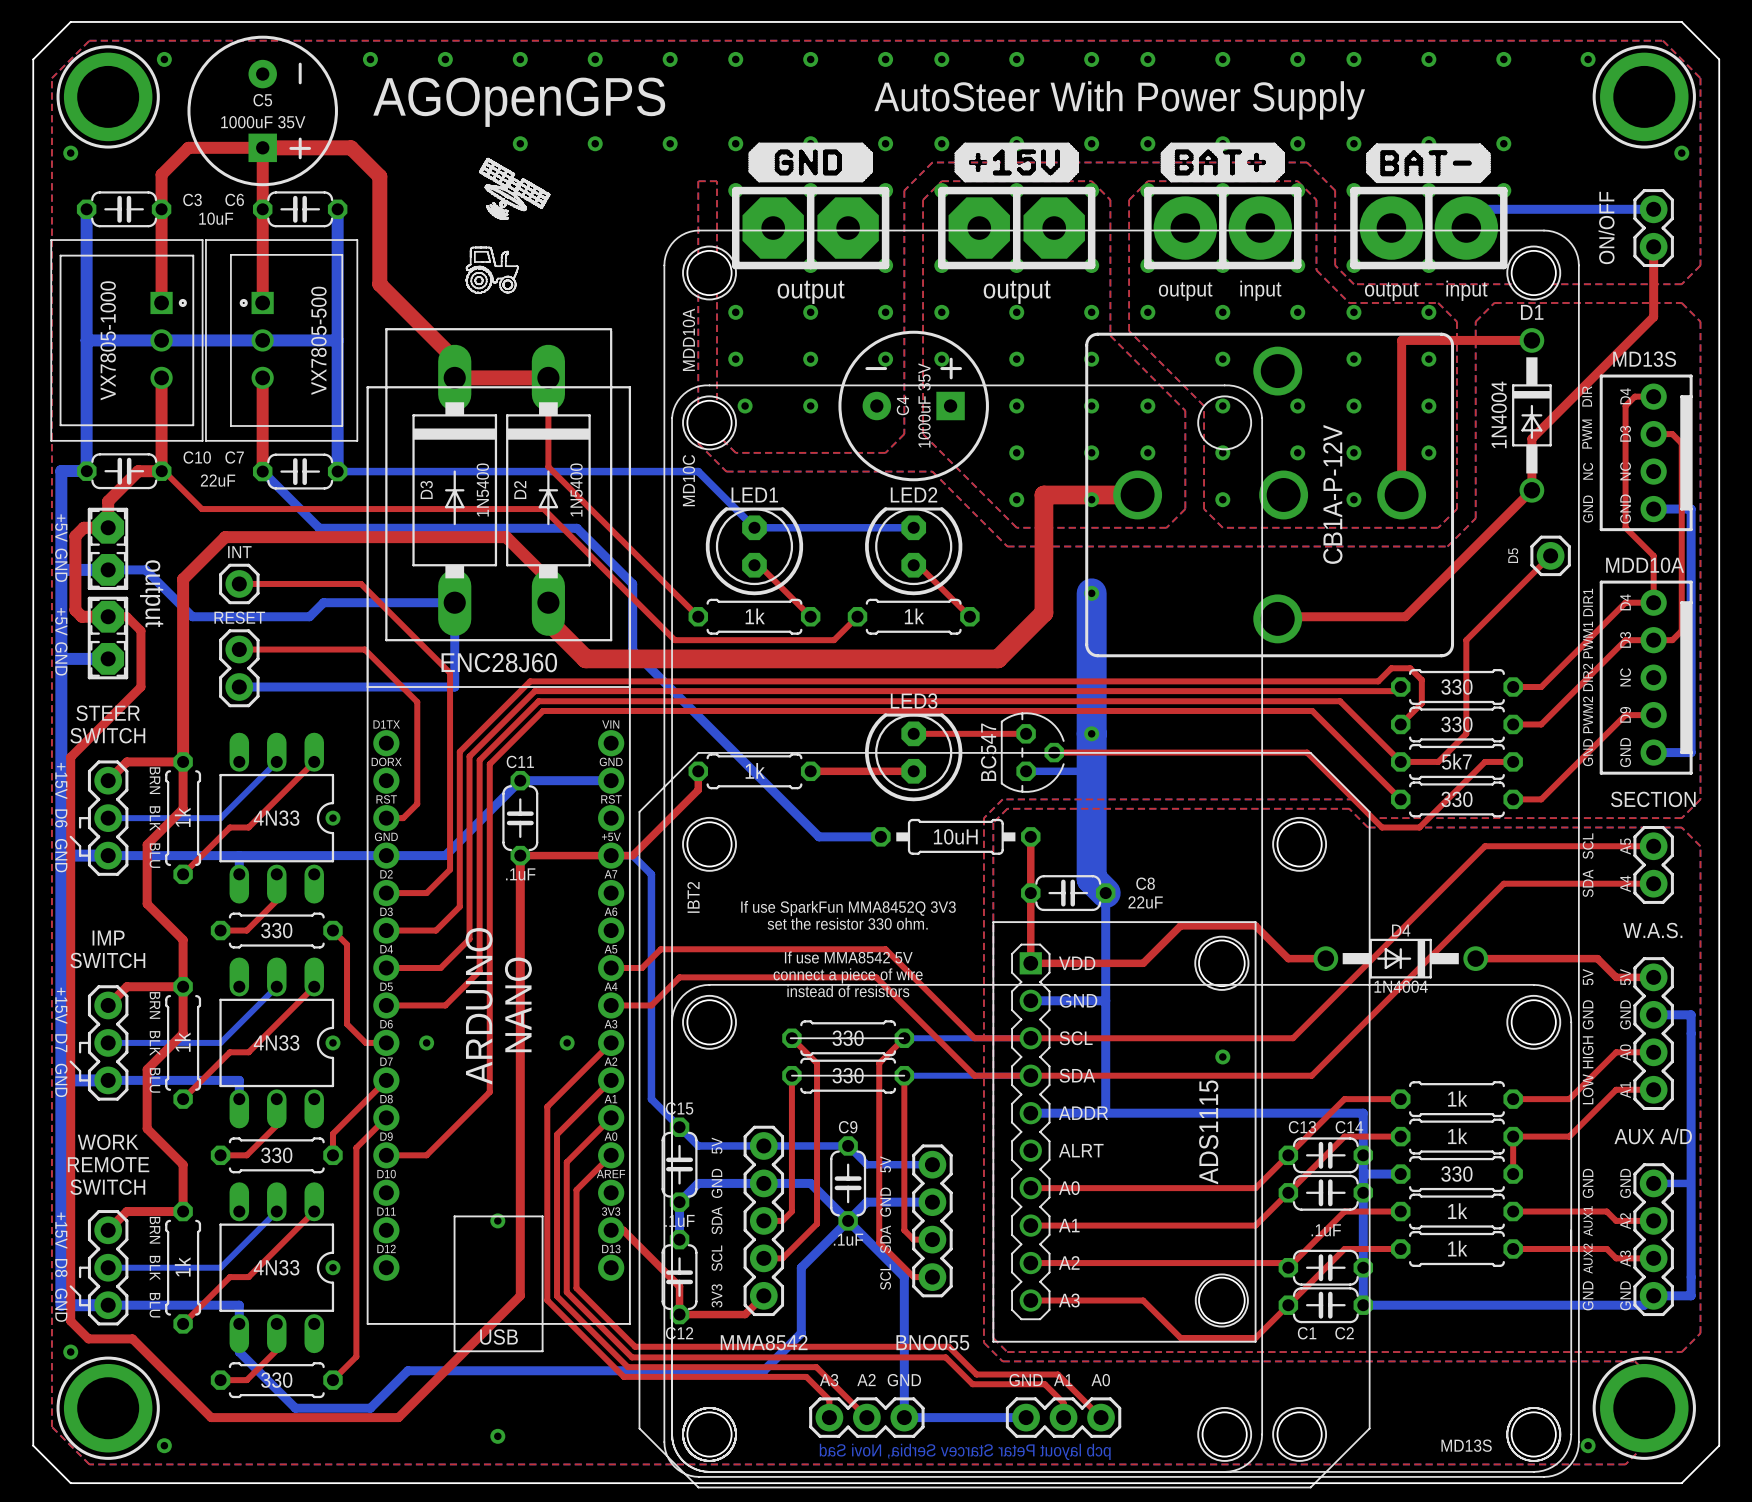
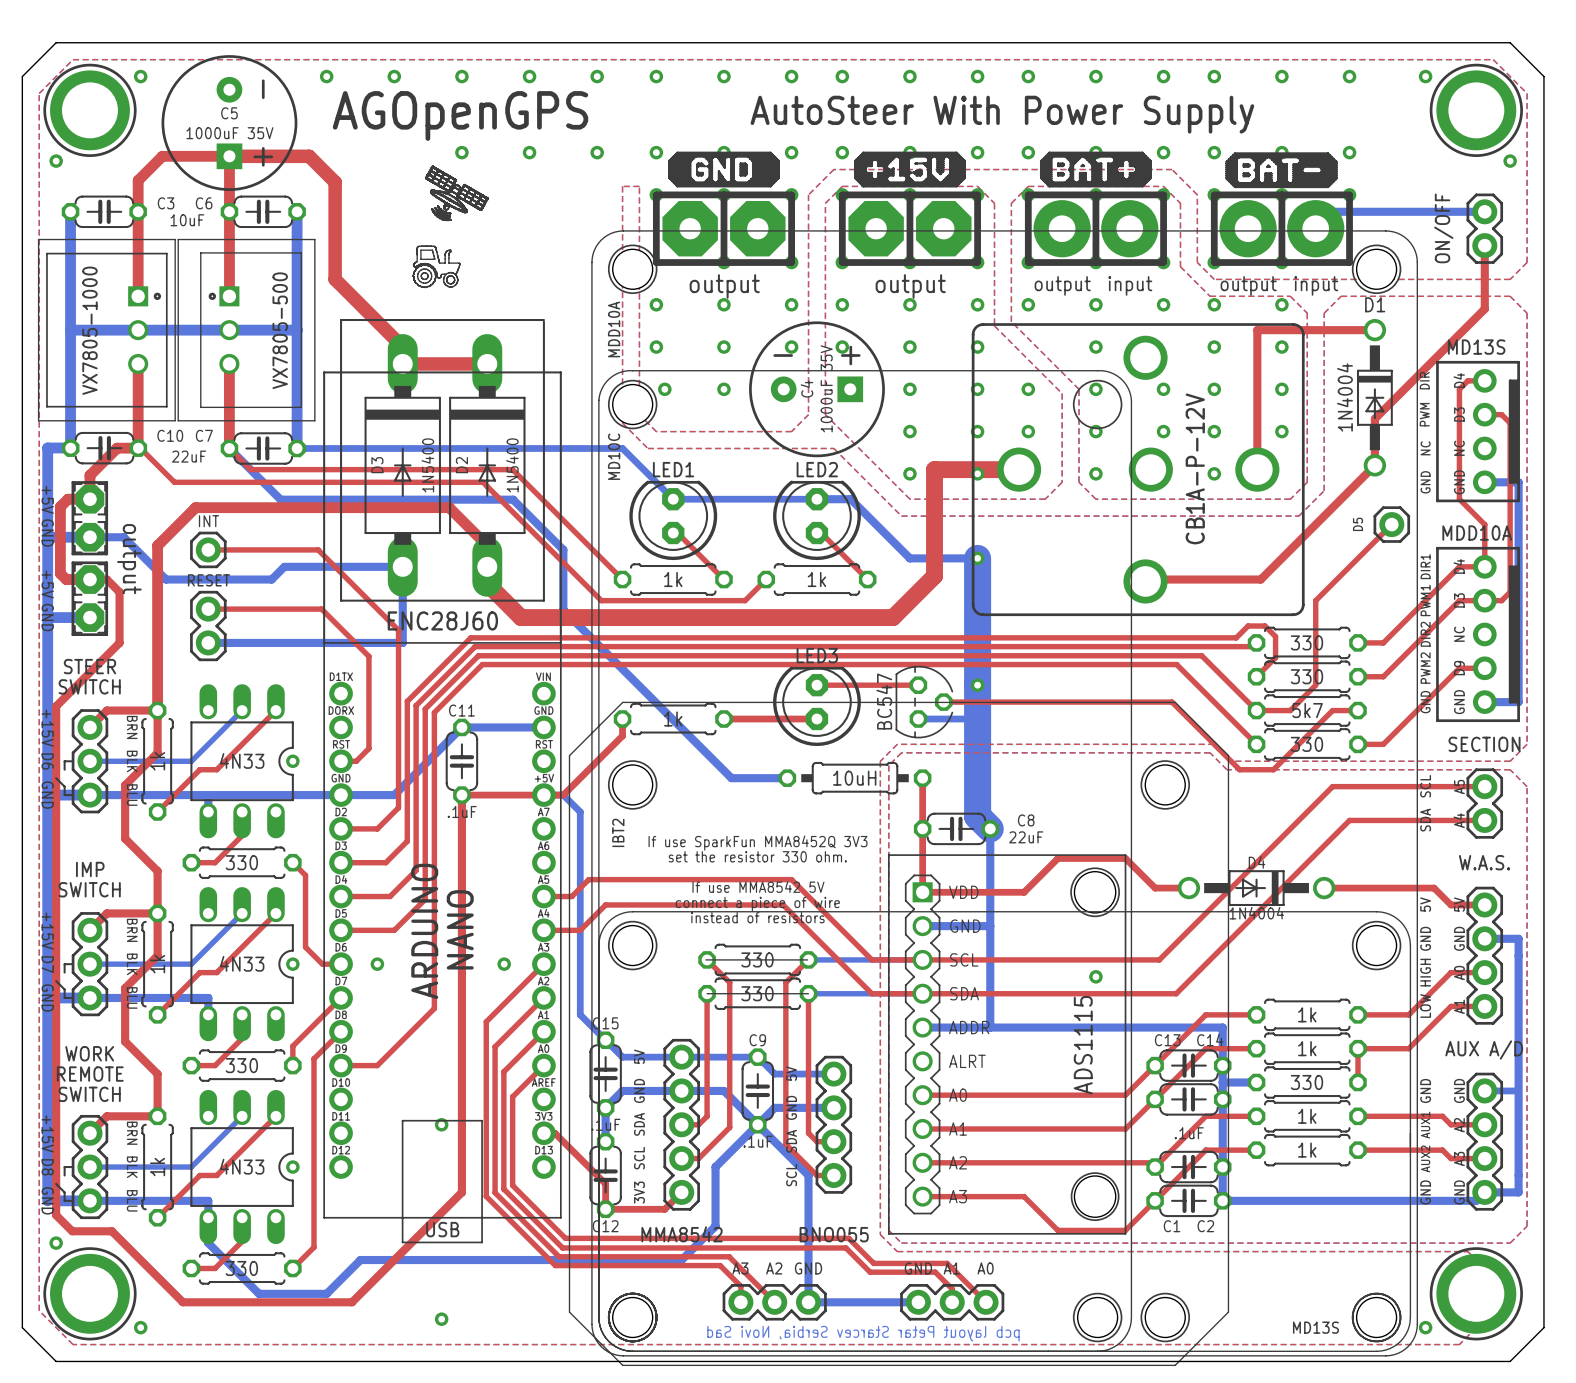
top track: (548, 377) (548, 466) (576, 494) -> (229, 448) (250, 469) (512, 469)
bottom track: none -> (816, 499) (850, 499) (909, 558) (977, 558)

